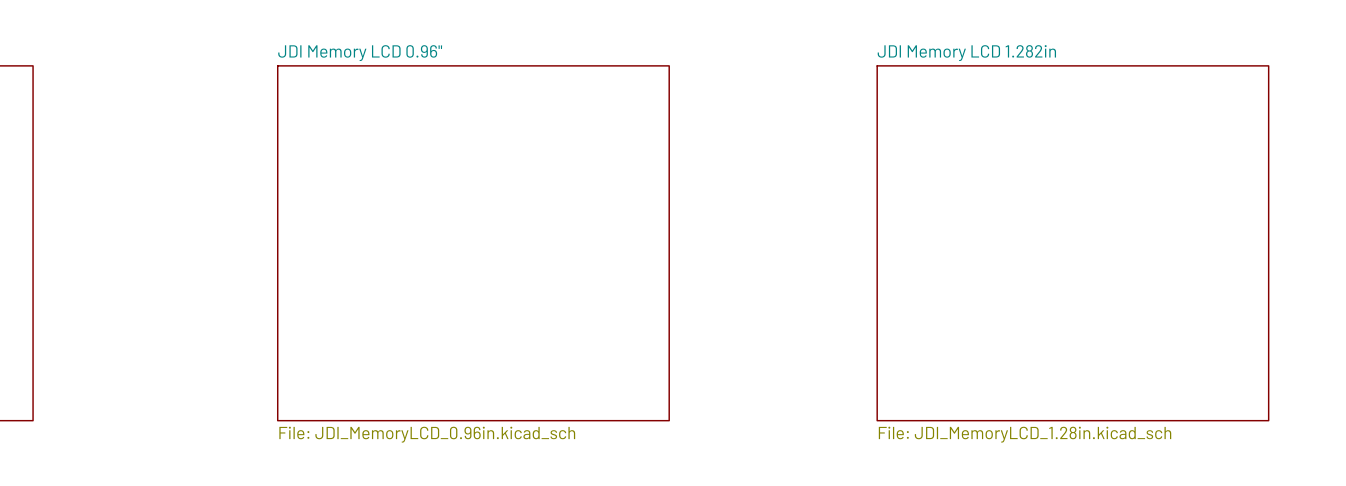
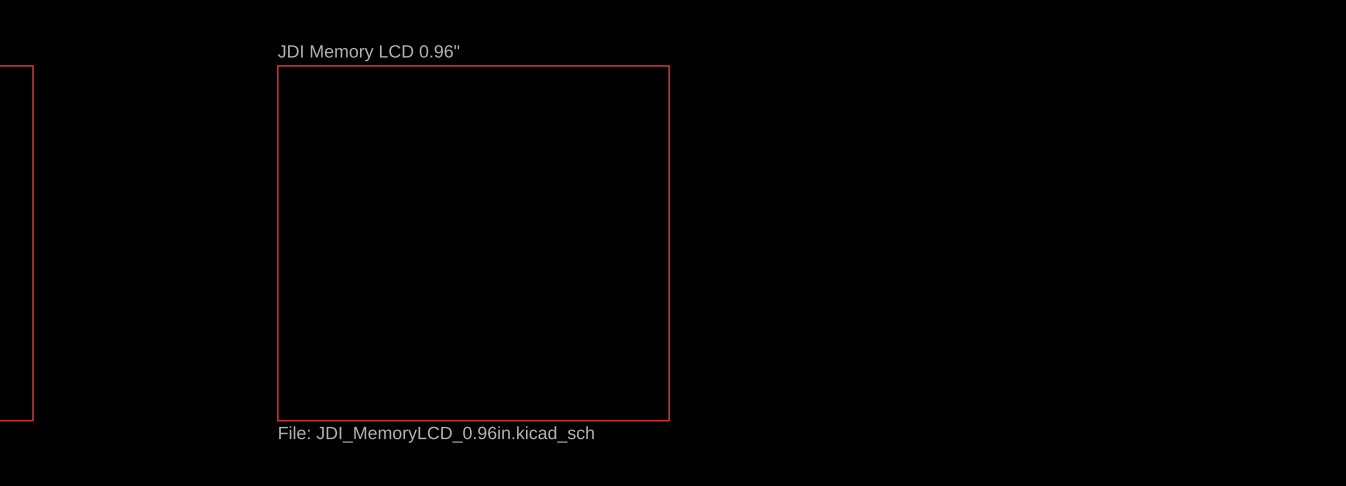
sheet JDI Memory LCD 1.282in: File: JDI_MemoryLCD_1.28in.kicad_sch (1072, 243) -> none

